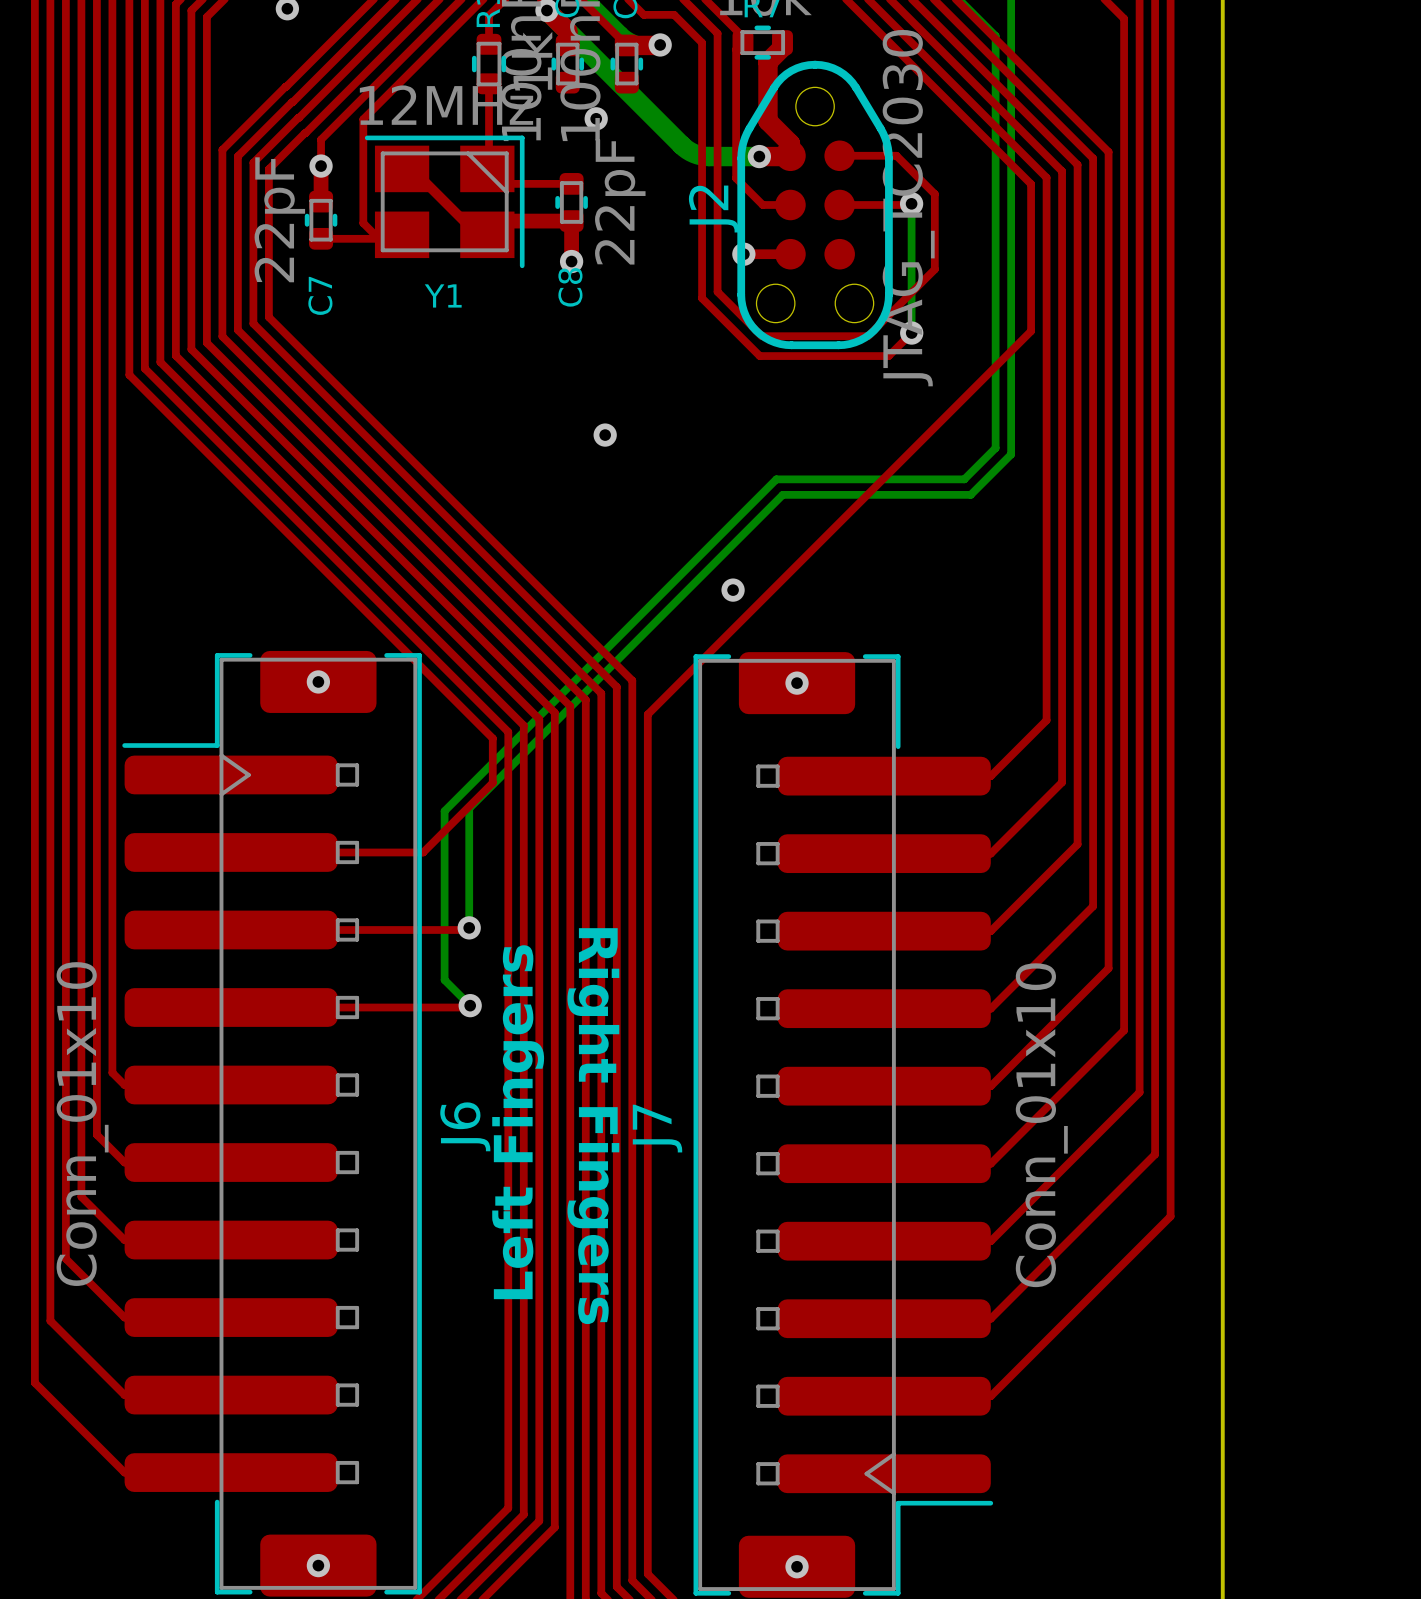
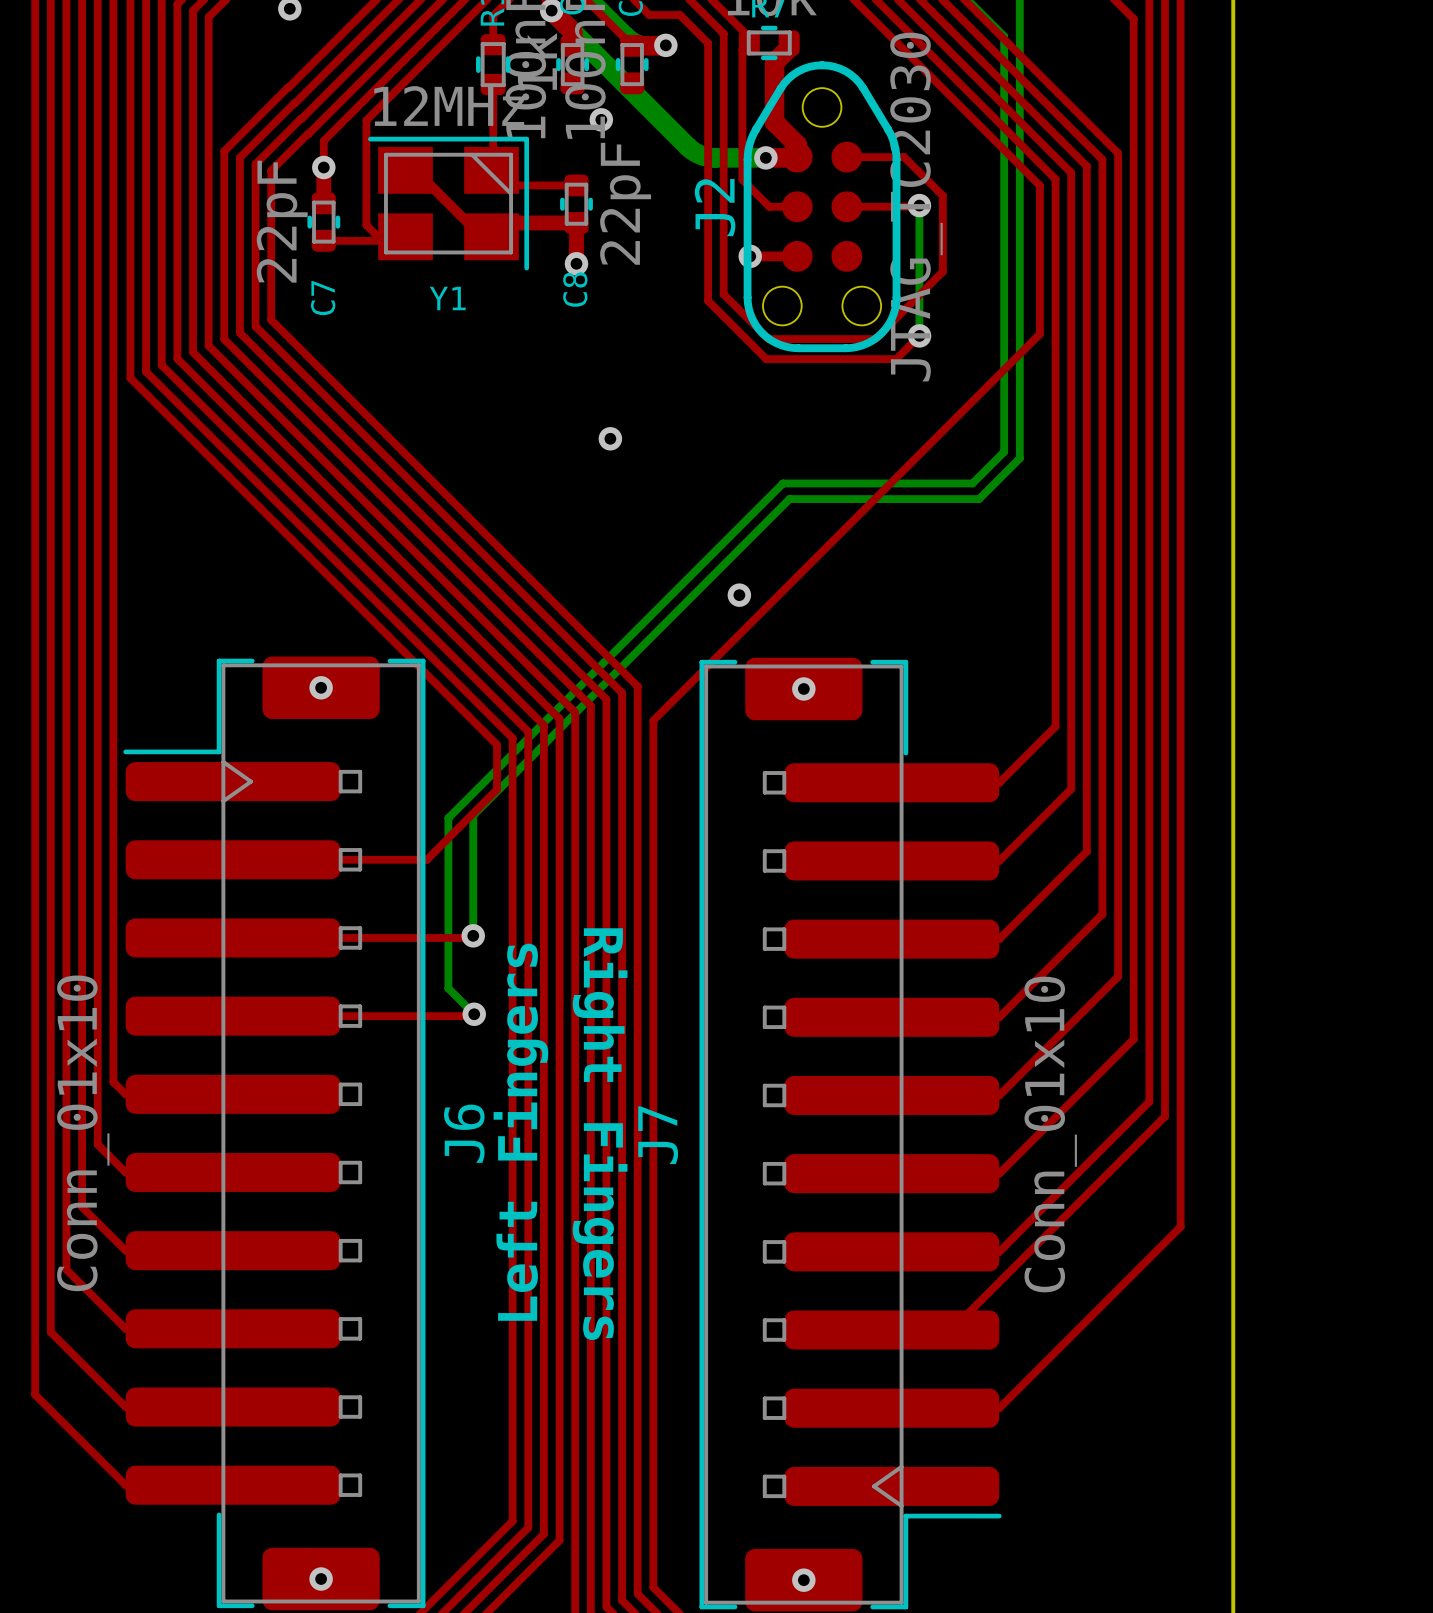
top track: (1155, 1107) (1155, 1154) (990, 1318) (943, 1318) -> (1165, 1116) (951, 1330)

